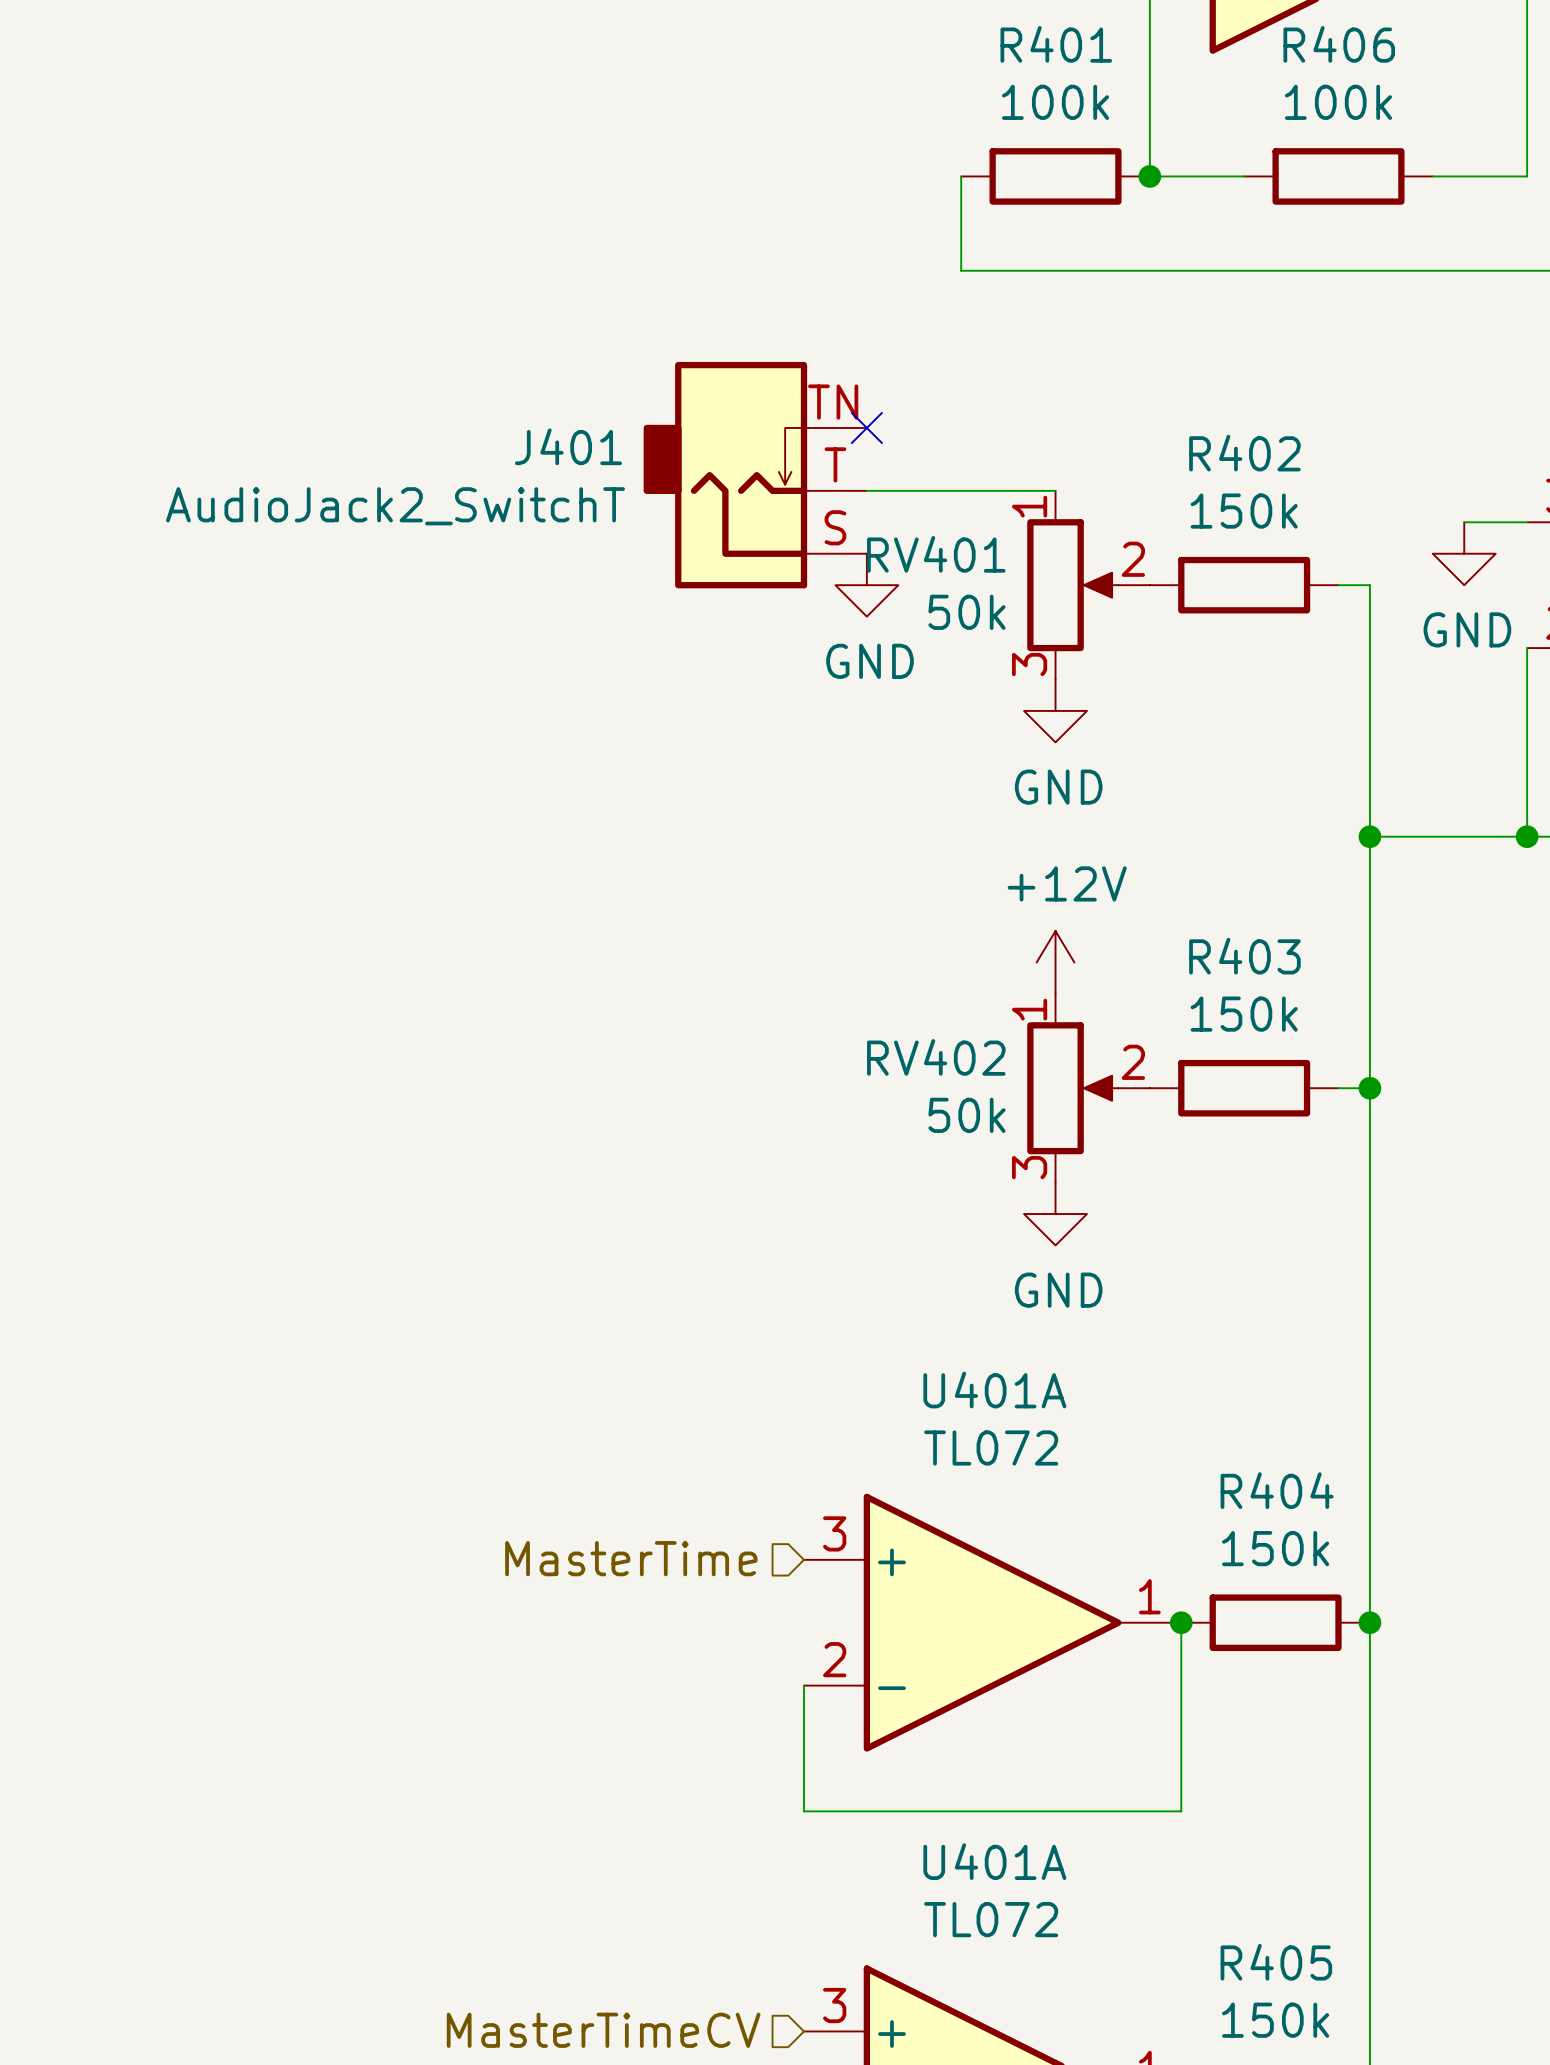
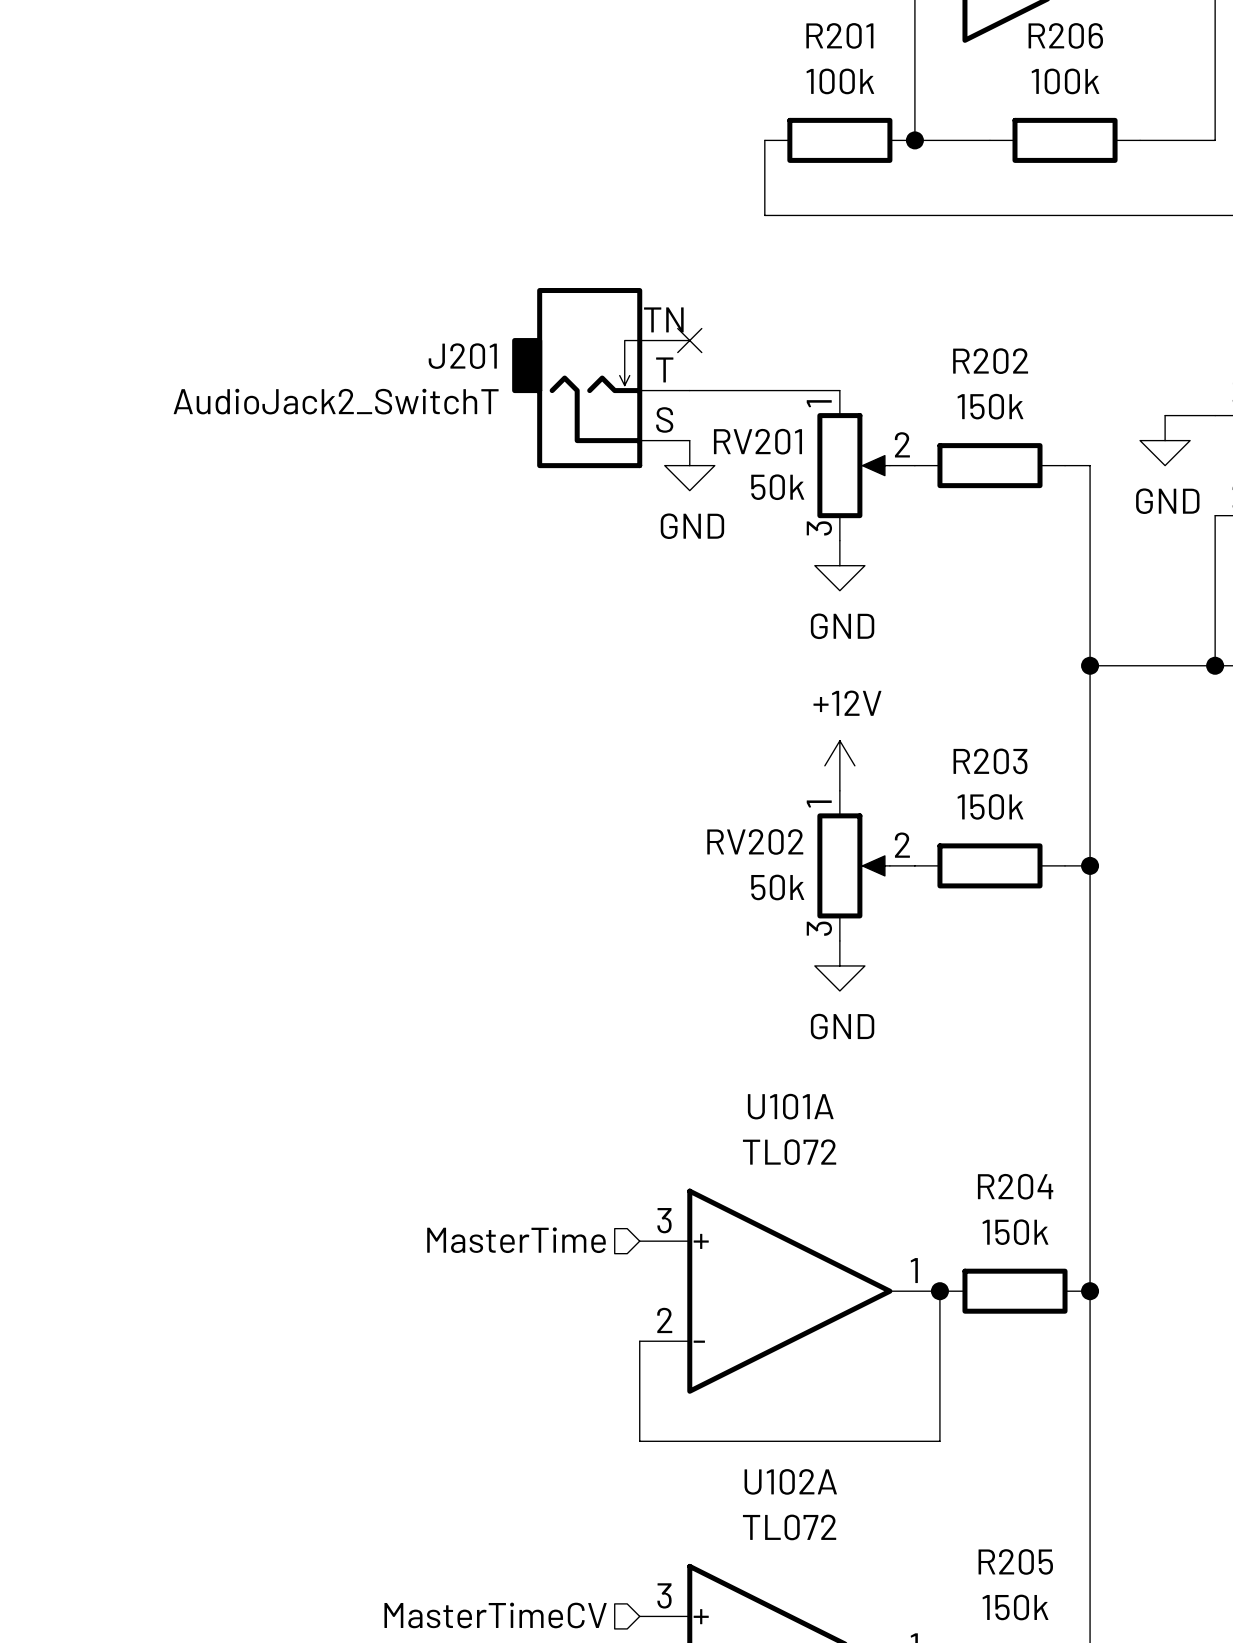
R401 name: R401 (1056, 44) -> R201 (839, 35)
R406 name: R406 (1339, 44) -> R206 (1065, 35)
J401 name: J401 (568, 446) -> J201 (462, 356)
R402 name: R402 (1244, 453) -> R202 (990, 361)
RV401 name: RV401 (936, 554) -> RV201 (757, 441)
R403 name: R403 (1244, 956) -> R203 (990, 761)
RV402 name: RV402 (936, 1057) -> RV202 (755, 841)
U401A name: U401A (994, 1390) -> U101A (790, 1106)
R404 name: R404 (1277, 1490) -> R204 (1015, 1186)
U401A name: U401A (994, 1861) -> U102A (790, 1481)
R405 name: R405 (1276, 1962) -> R205 (1015, 1561)

